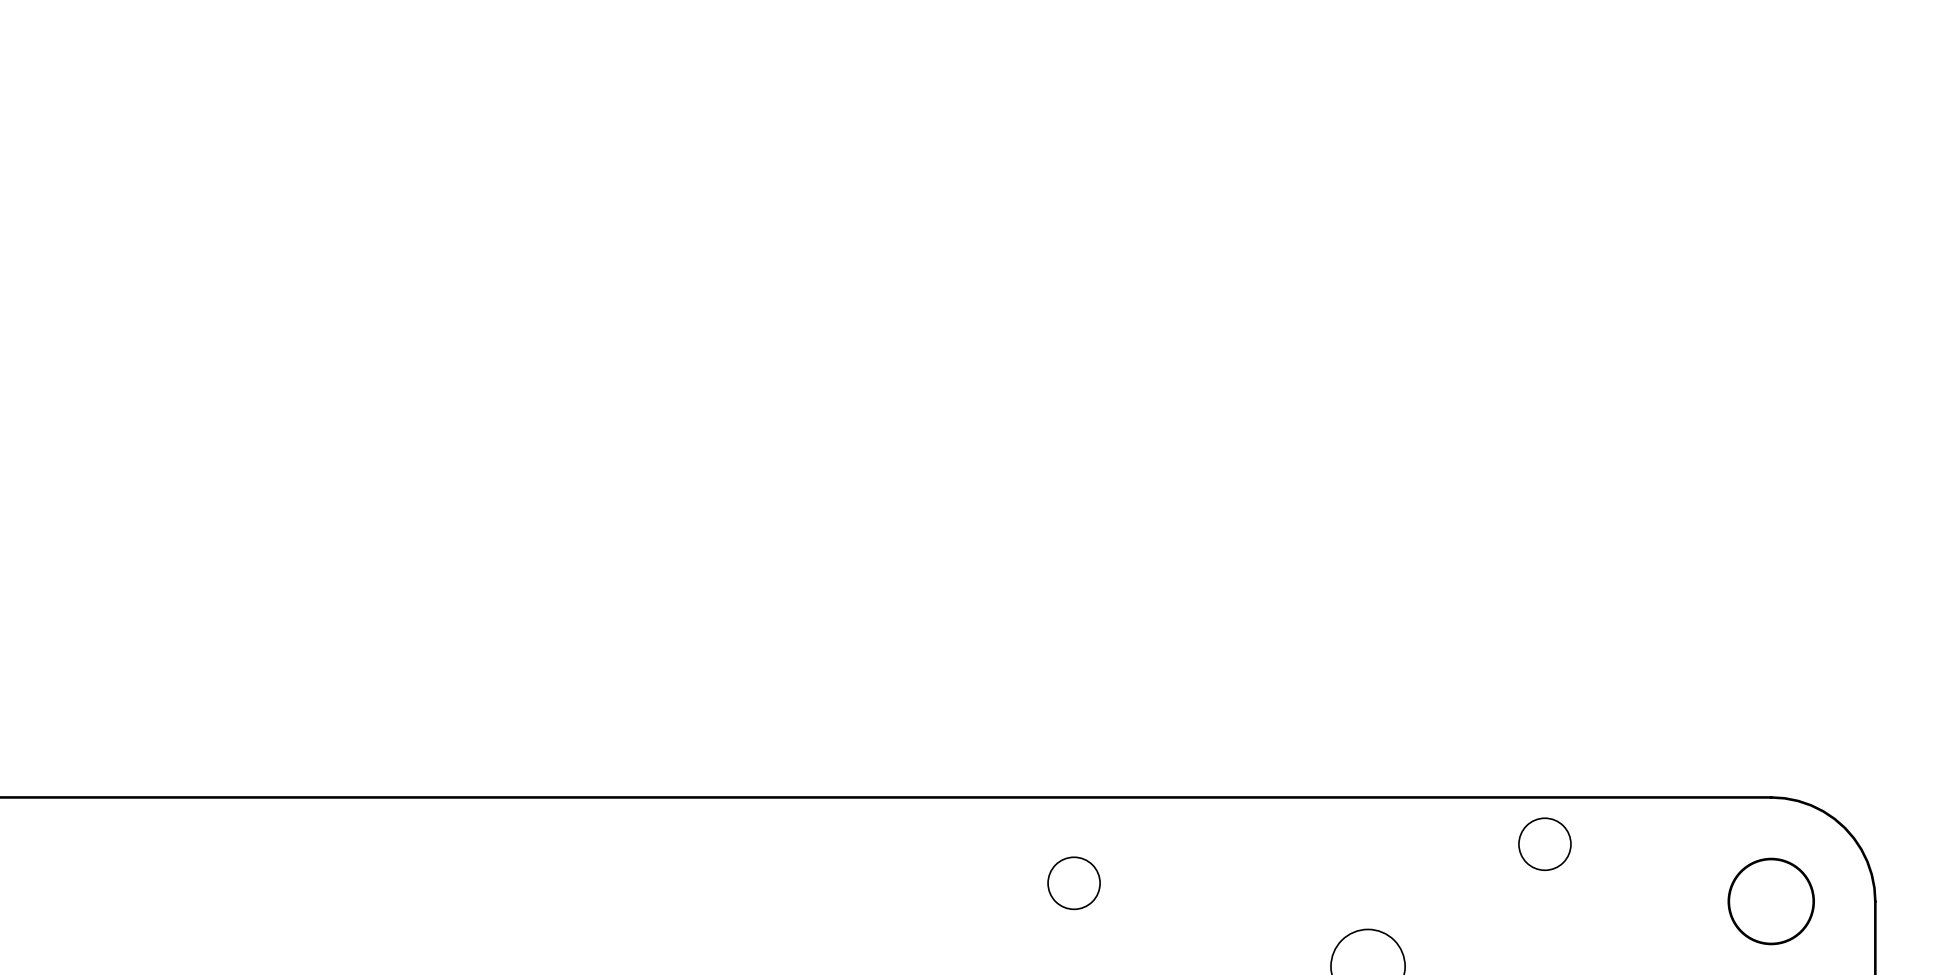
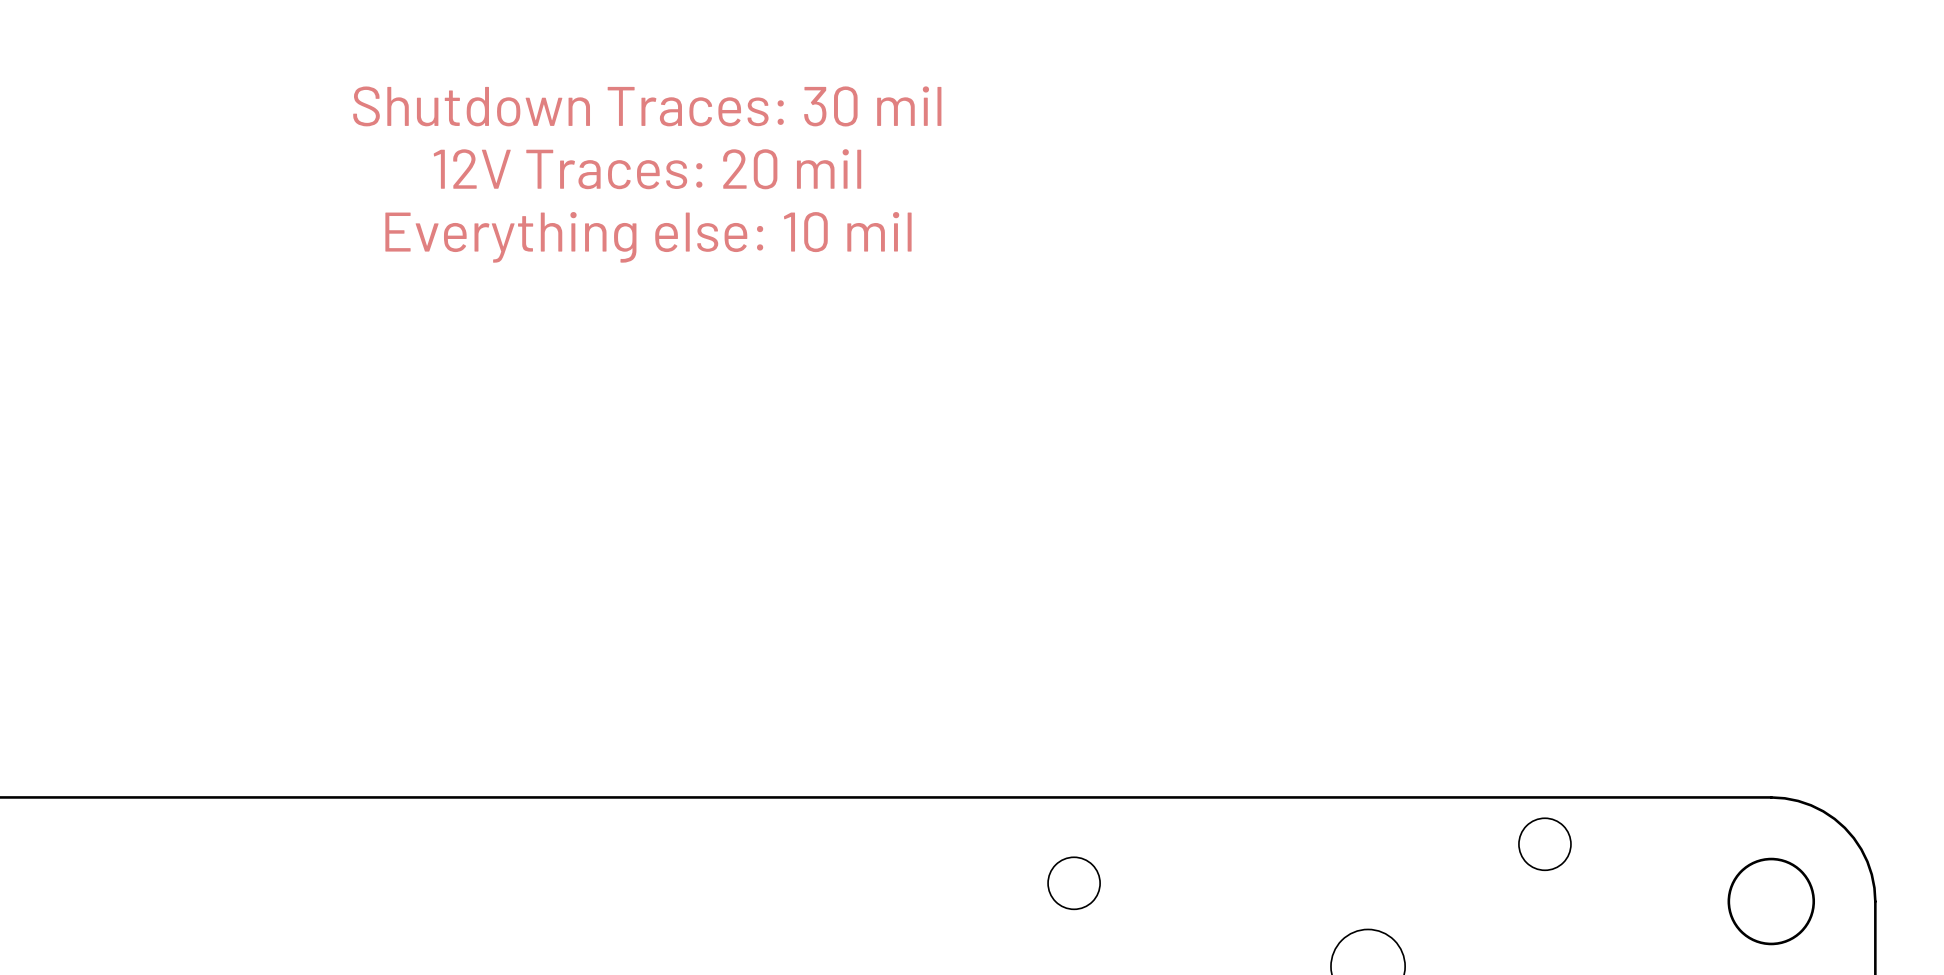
text: none -> Shutdown Traces: 30 mil (647, 106)
text: none -> 12V Traces: 20 mil (647, 169)
text: none -> Everything else: 10 mil (648, 237)

